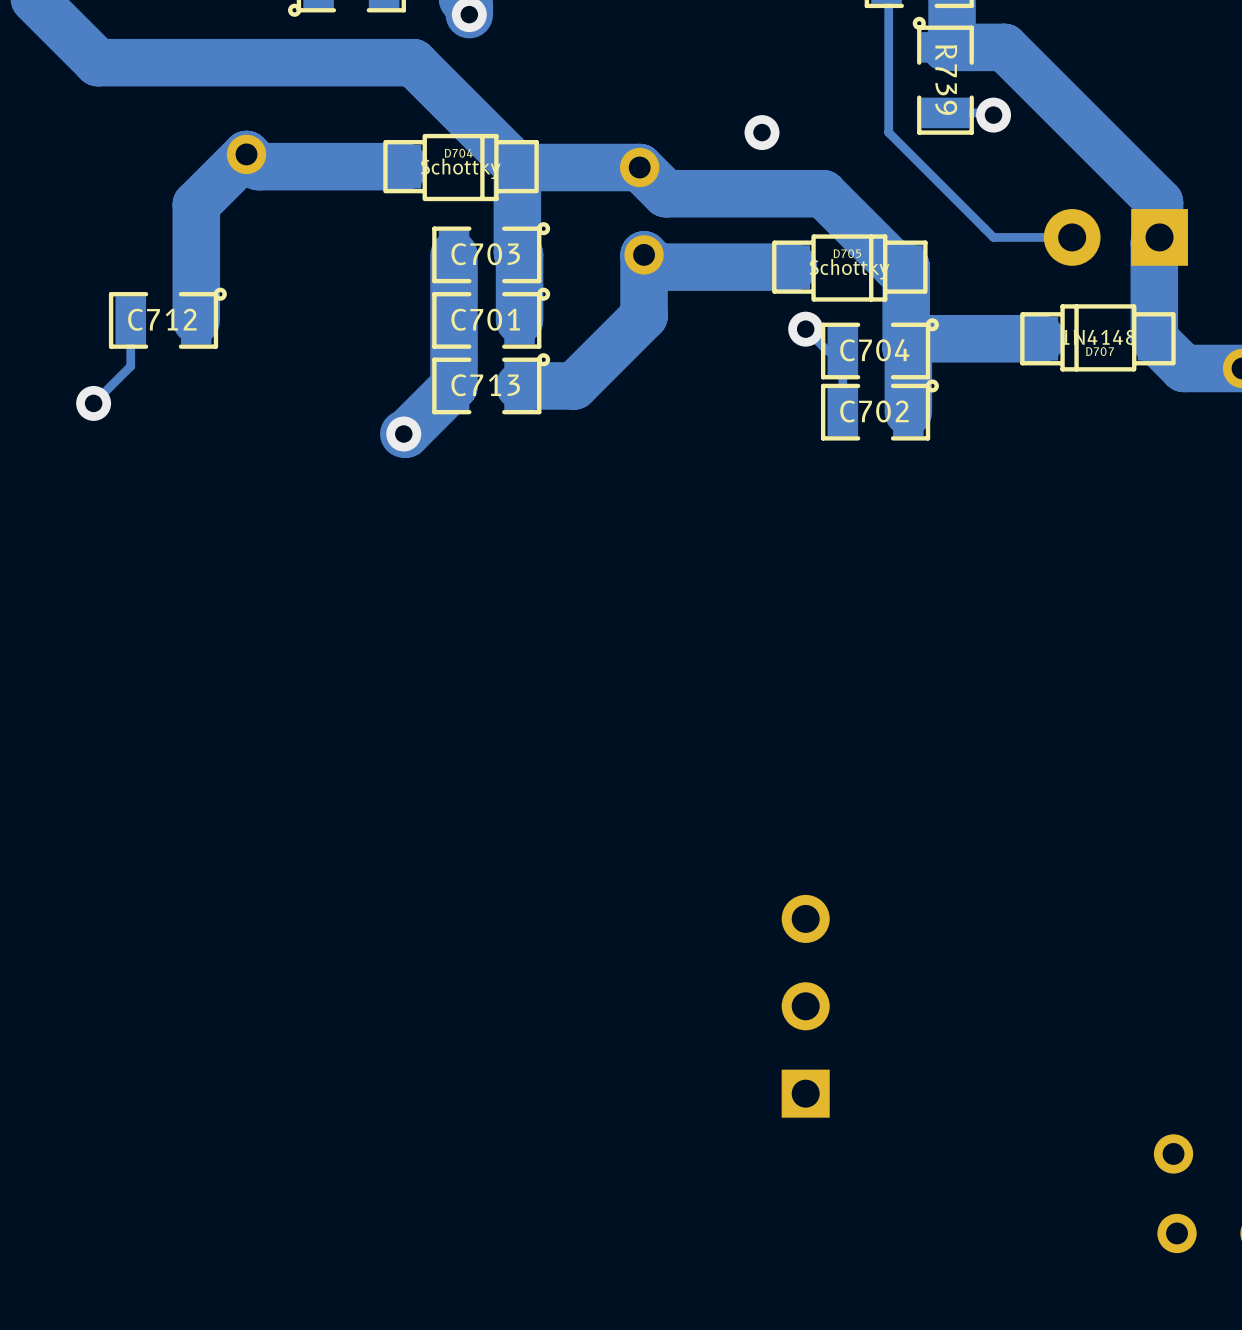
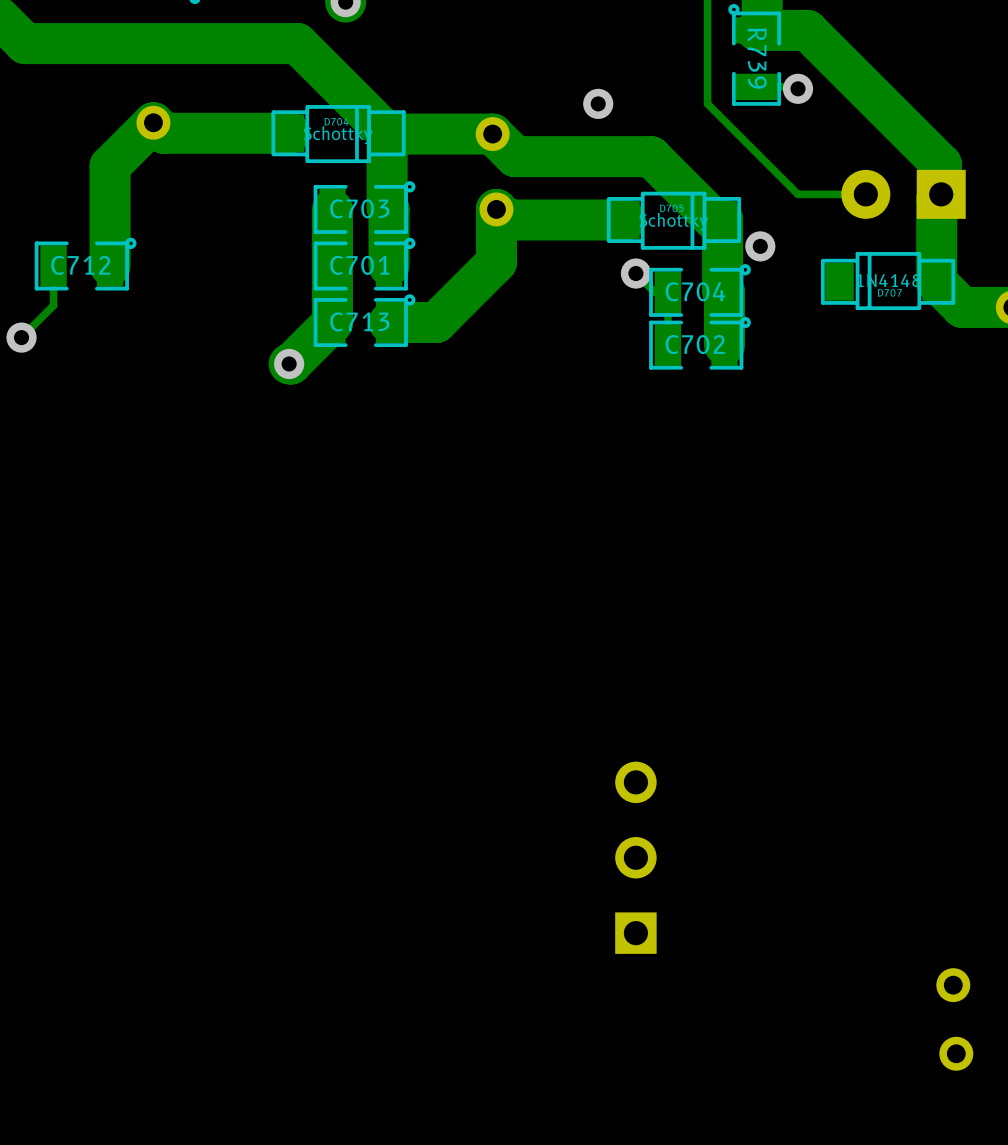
via: none -> (760, 246)
track: (1041, 338) (920, 338) (908, 351) -> none

